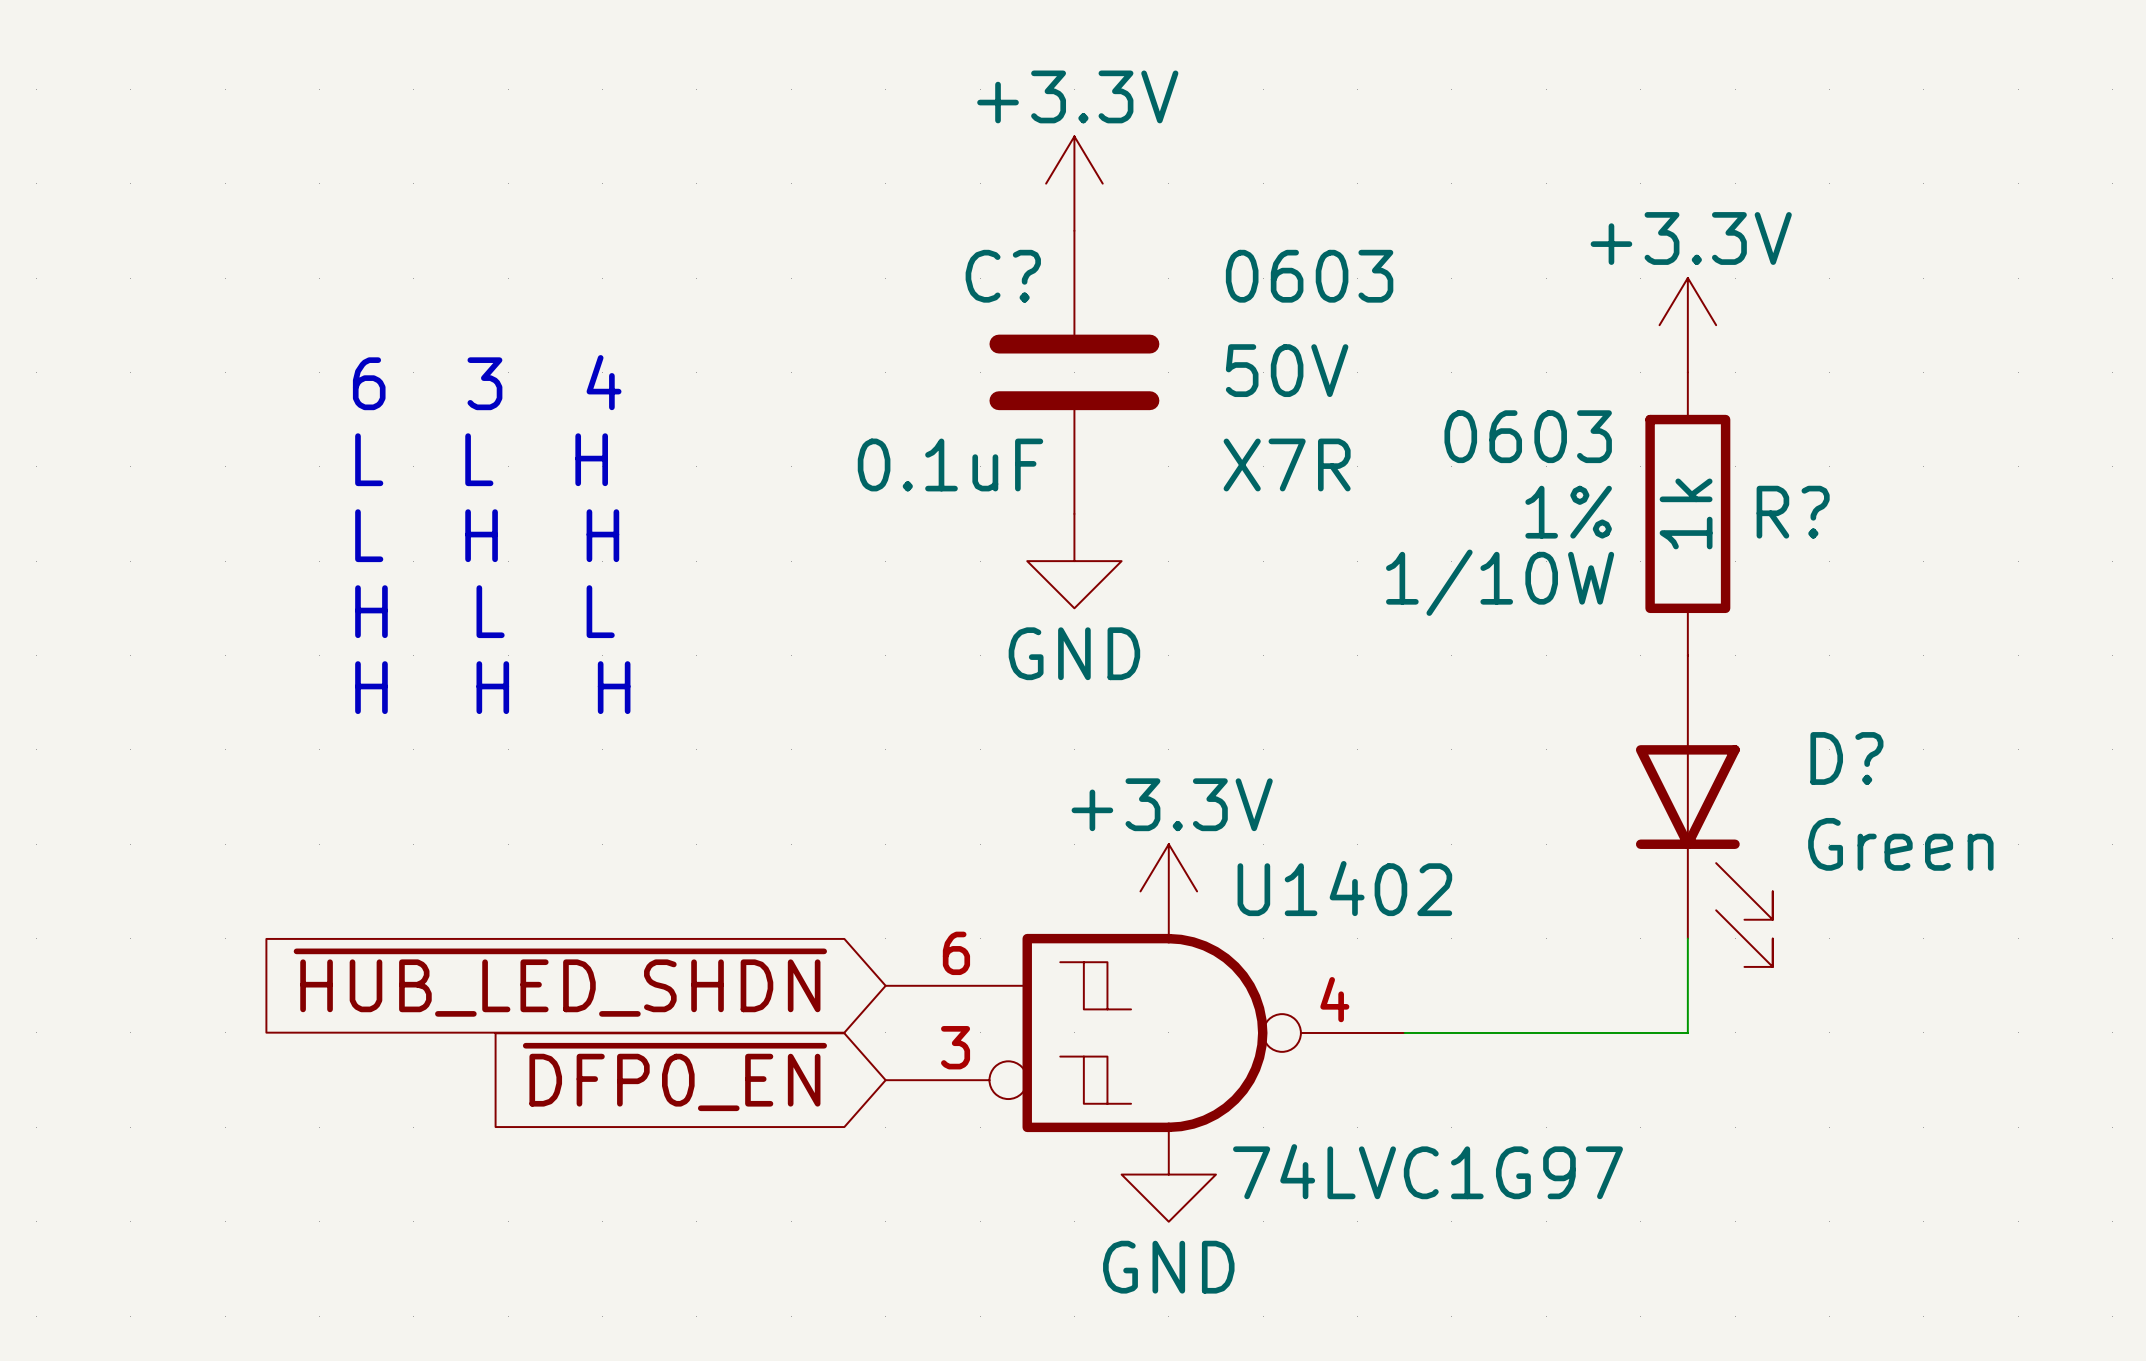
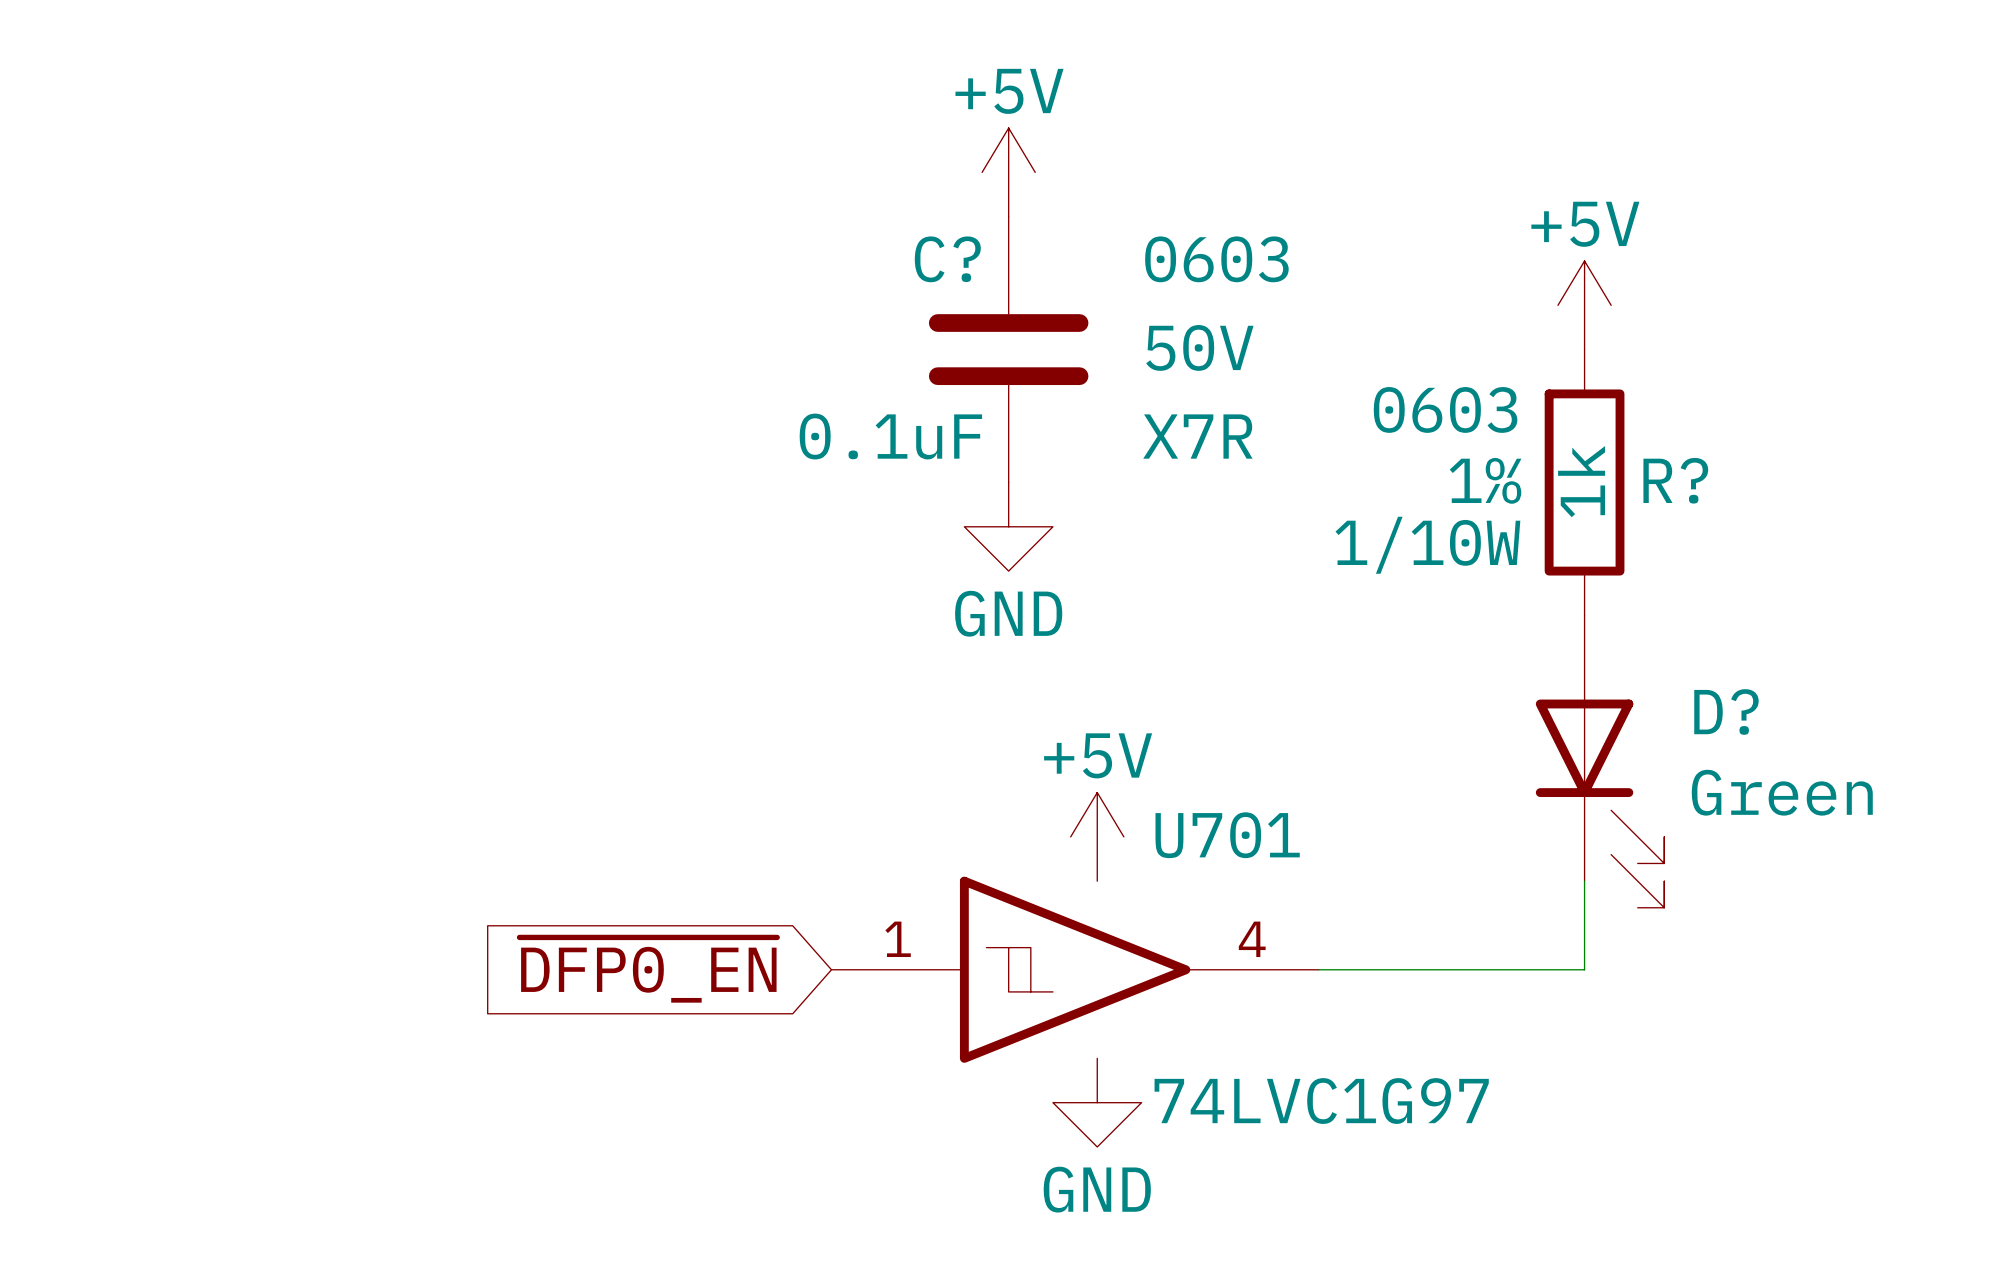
power symbol: +3.3V (1074, 183) -> +5V (1008, 172)
power symbol: +3.3V (1687, 325) -> +5V (1584, 305)
text: 6 3 4 (487, 382) -> none
text: L L H (481, 459) -> none
text: L H H (487, 535) -> none
text: H L L (484, 611) -> none
text: H H H (492, 687) -> none
power symbol: +3.3V (1168, 891) -> +5V (1097, 836)
global label: ~{HUB_LED_SHDN} (560, 982) -> none
U1402: 74LVC1G97 (1145, 1032) -> none
U701: none -> 74LVC1G97 (1075, 969)
global label position: ~{DFP0_EN} (674, 1077) -> ~{DFP0_EN} (648, 970)

